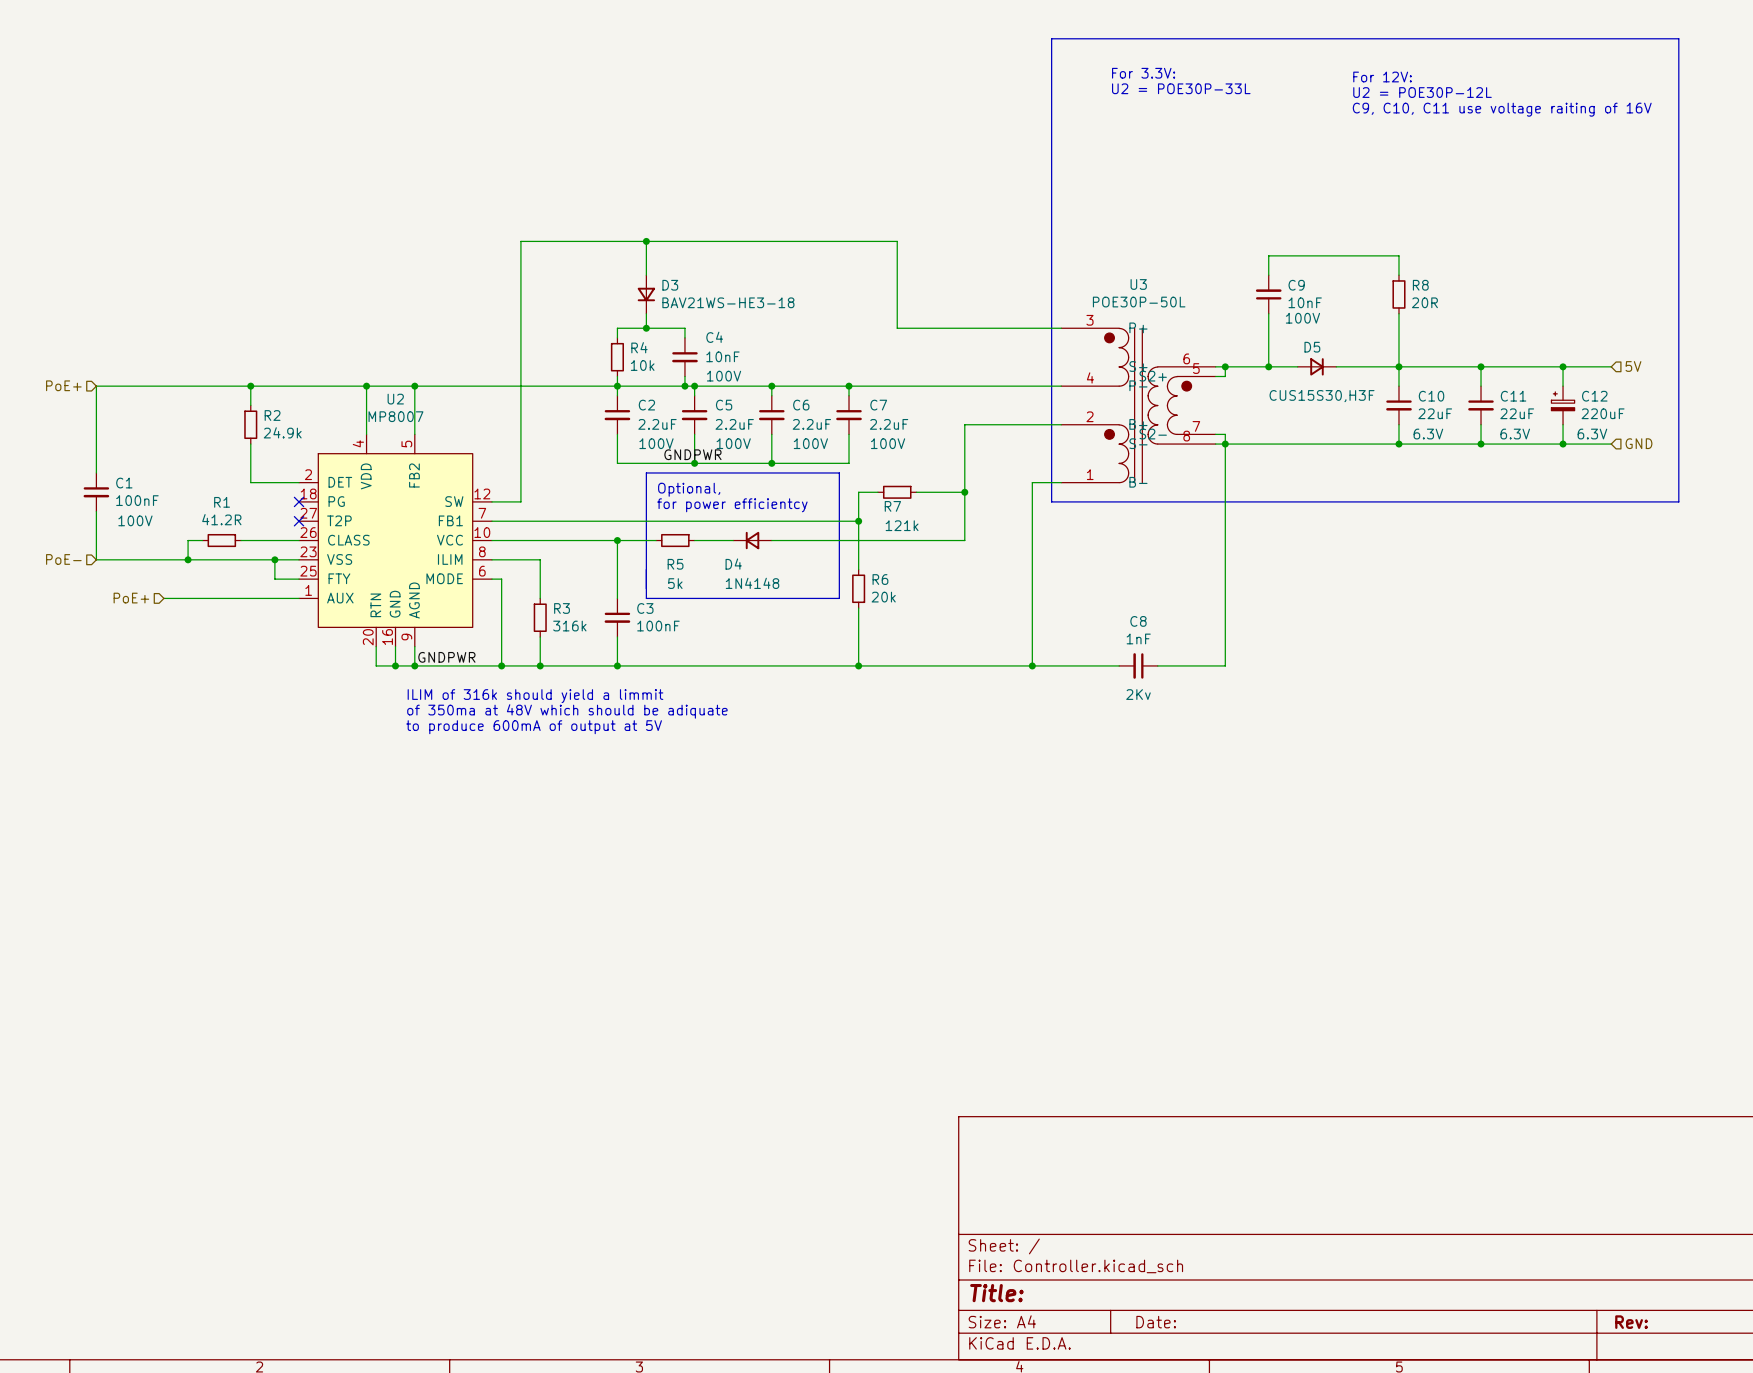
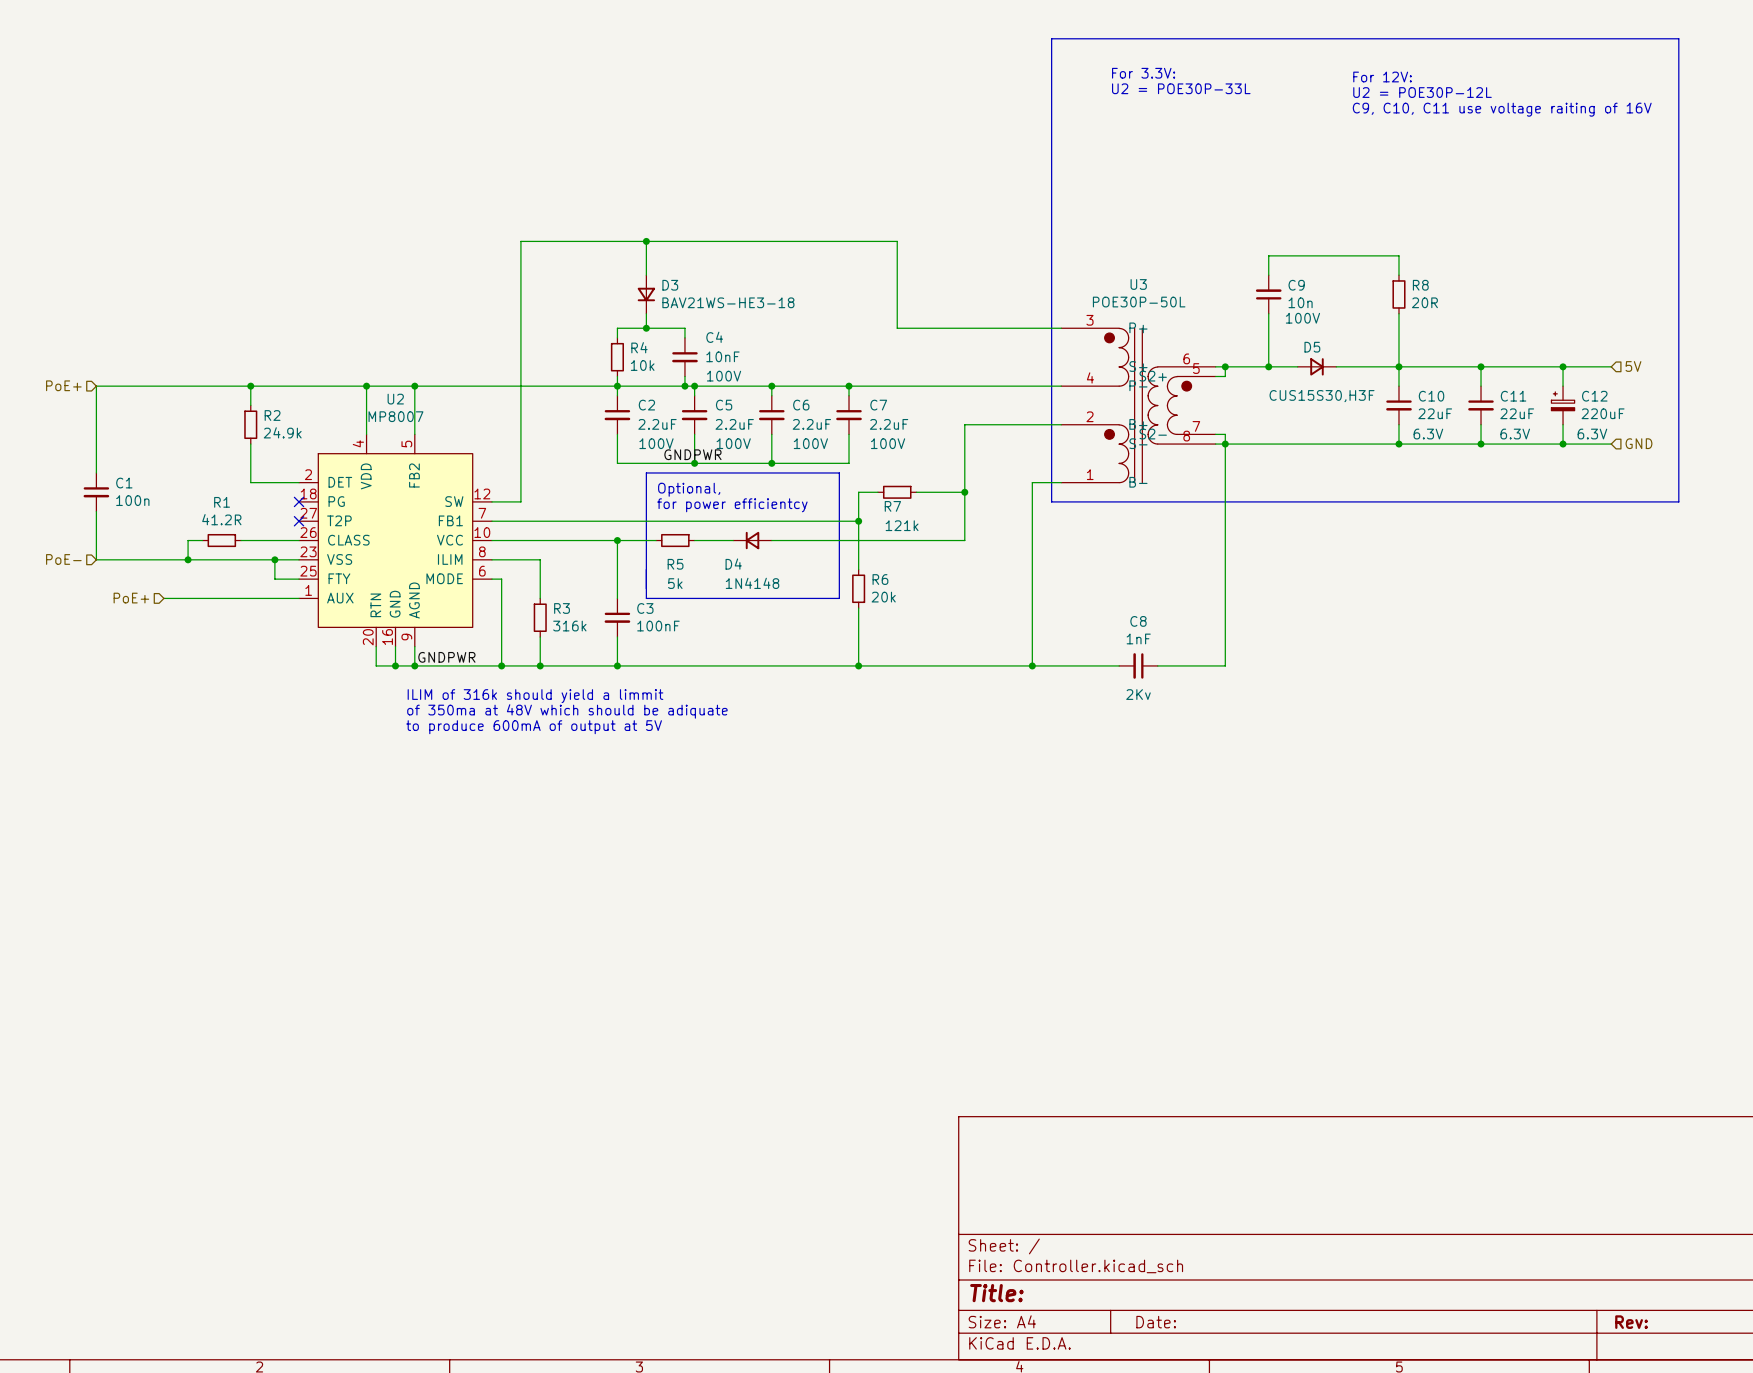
C9 value: 10nF (1305, 302) -> 10n (1300, 302)
C1 value: 100nF (137, 500) -> 100n (132, 500)
C1 text: 100V (135, 520) -> none

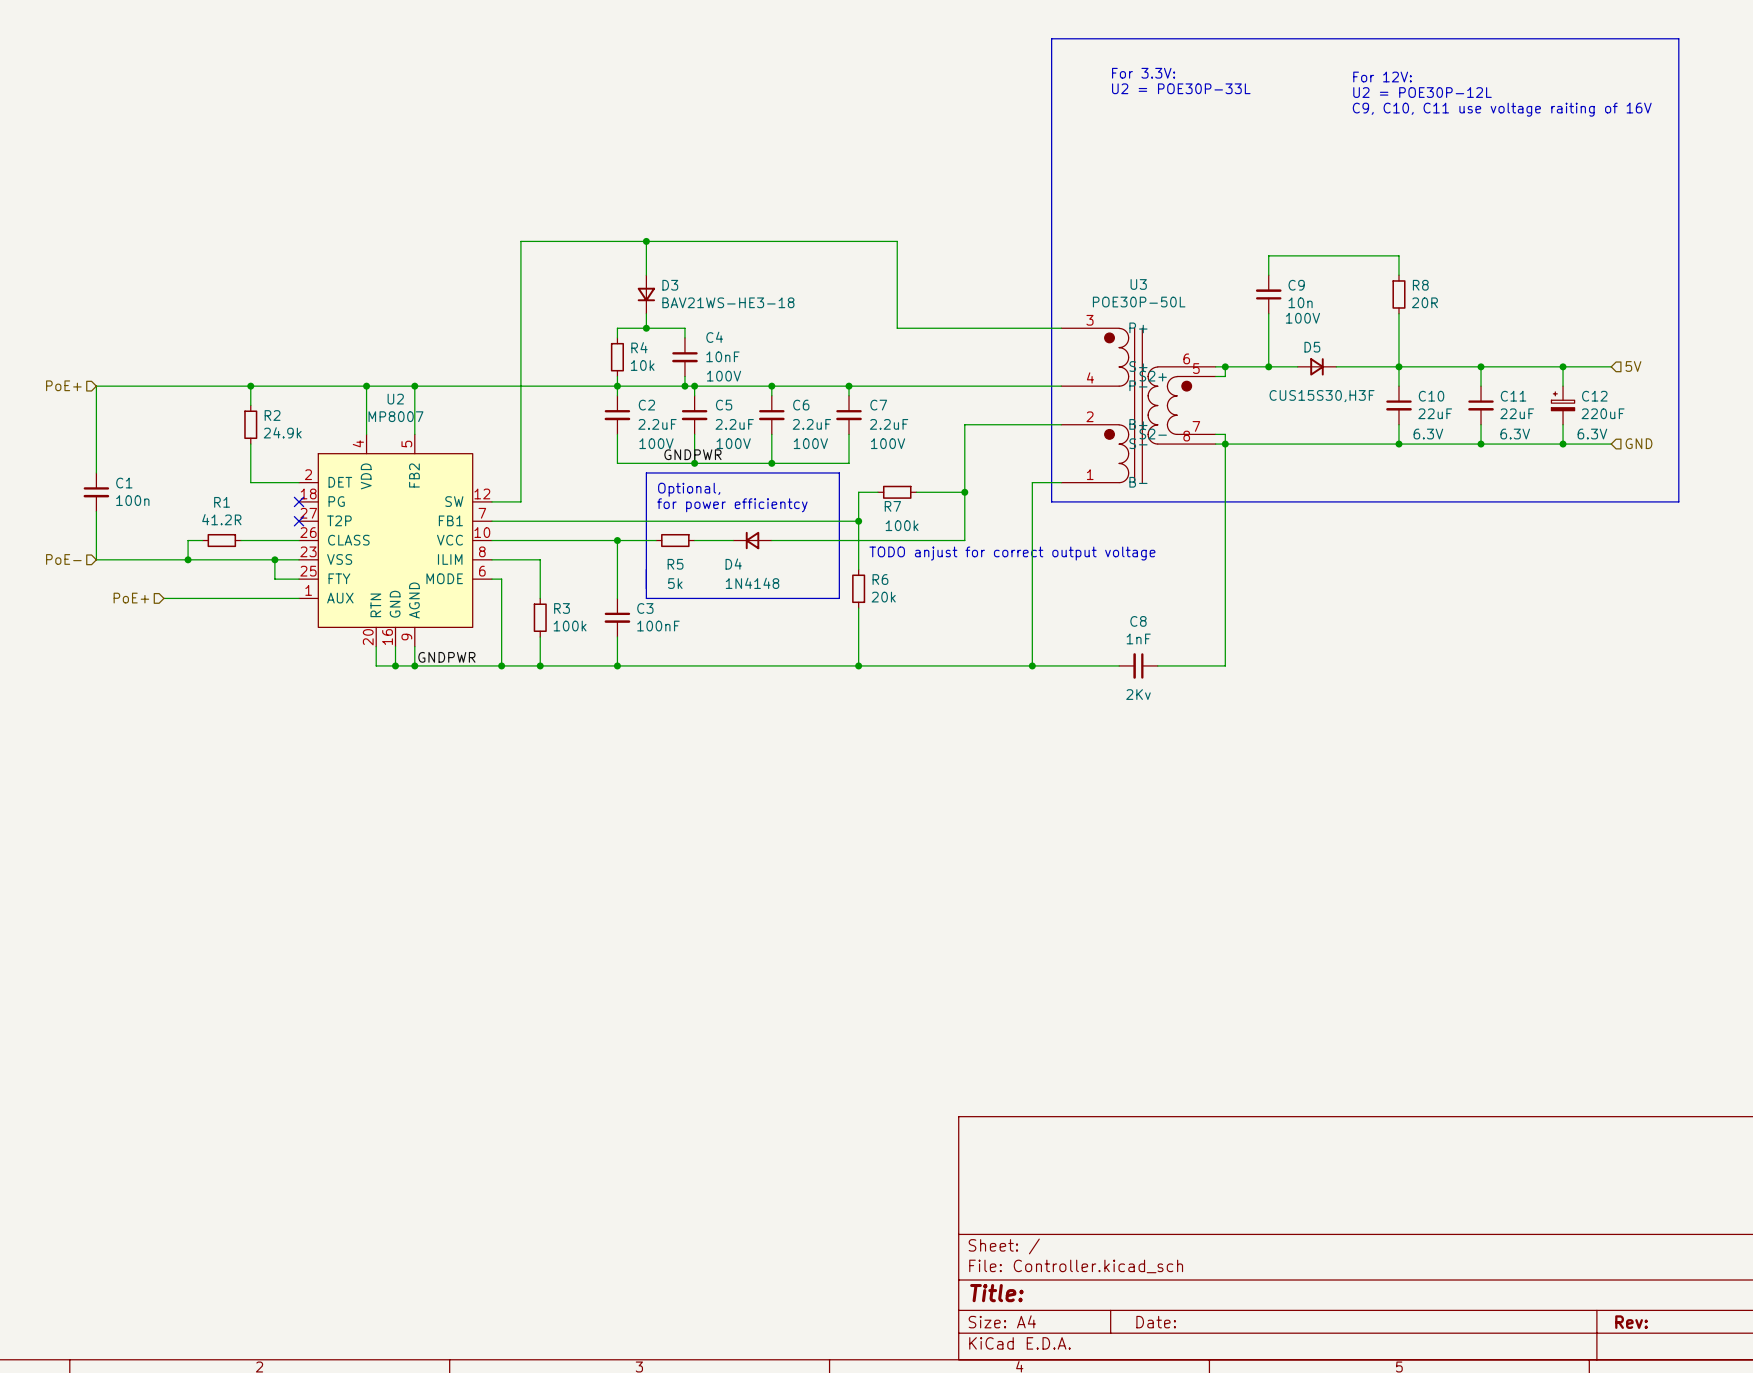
R7 value: 121k (902, 525) -> 100k (902, 525)
text: none -> TODO anjust for correct output voltage (1012, 553)
R3 value: 316k (569, 626) -> 100k (570, 626)
text: ILIM of 316k should yield a limmit (535, 696) -> none
text: of 350ma at 48V which should be adiquate (567, 711) -> none
text: to produce 600mA of output at 5V (534, 727) -> none

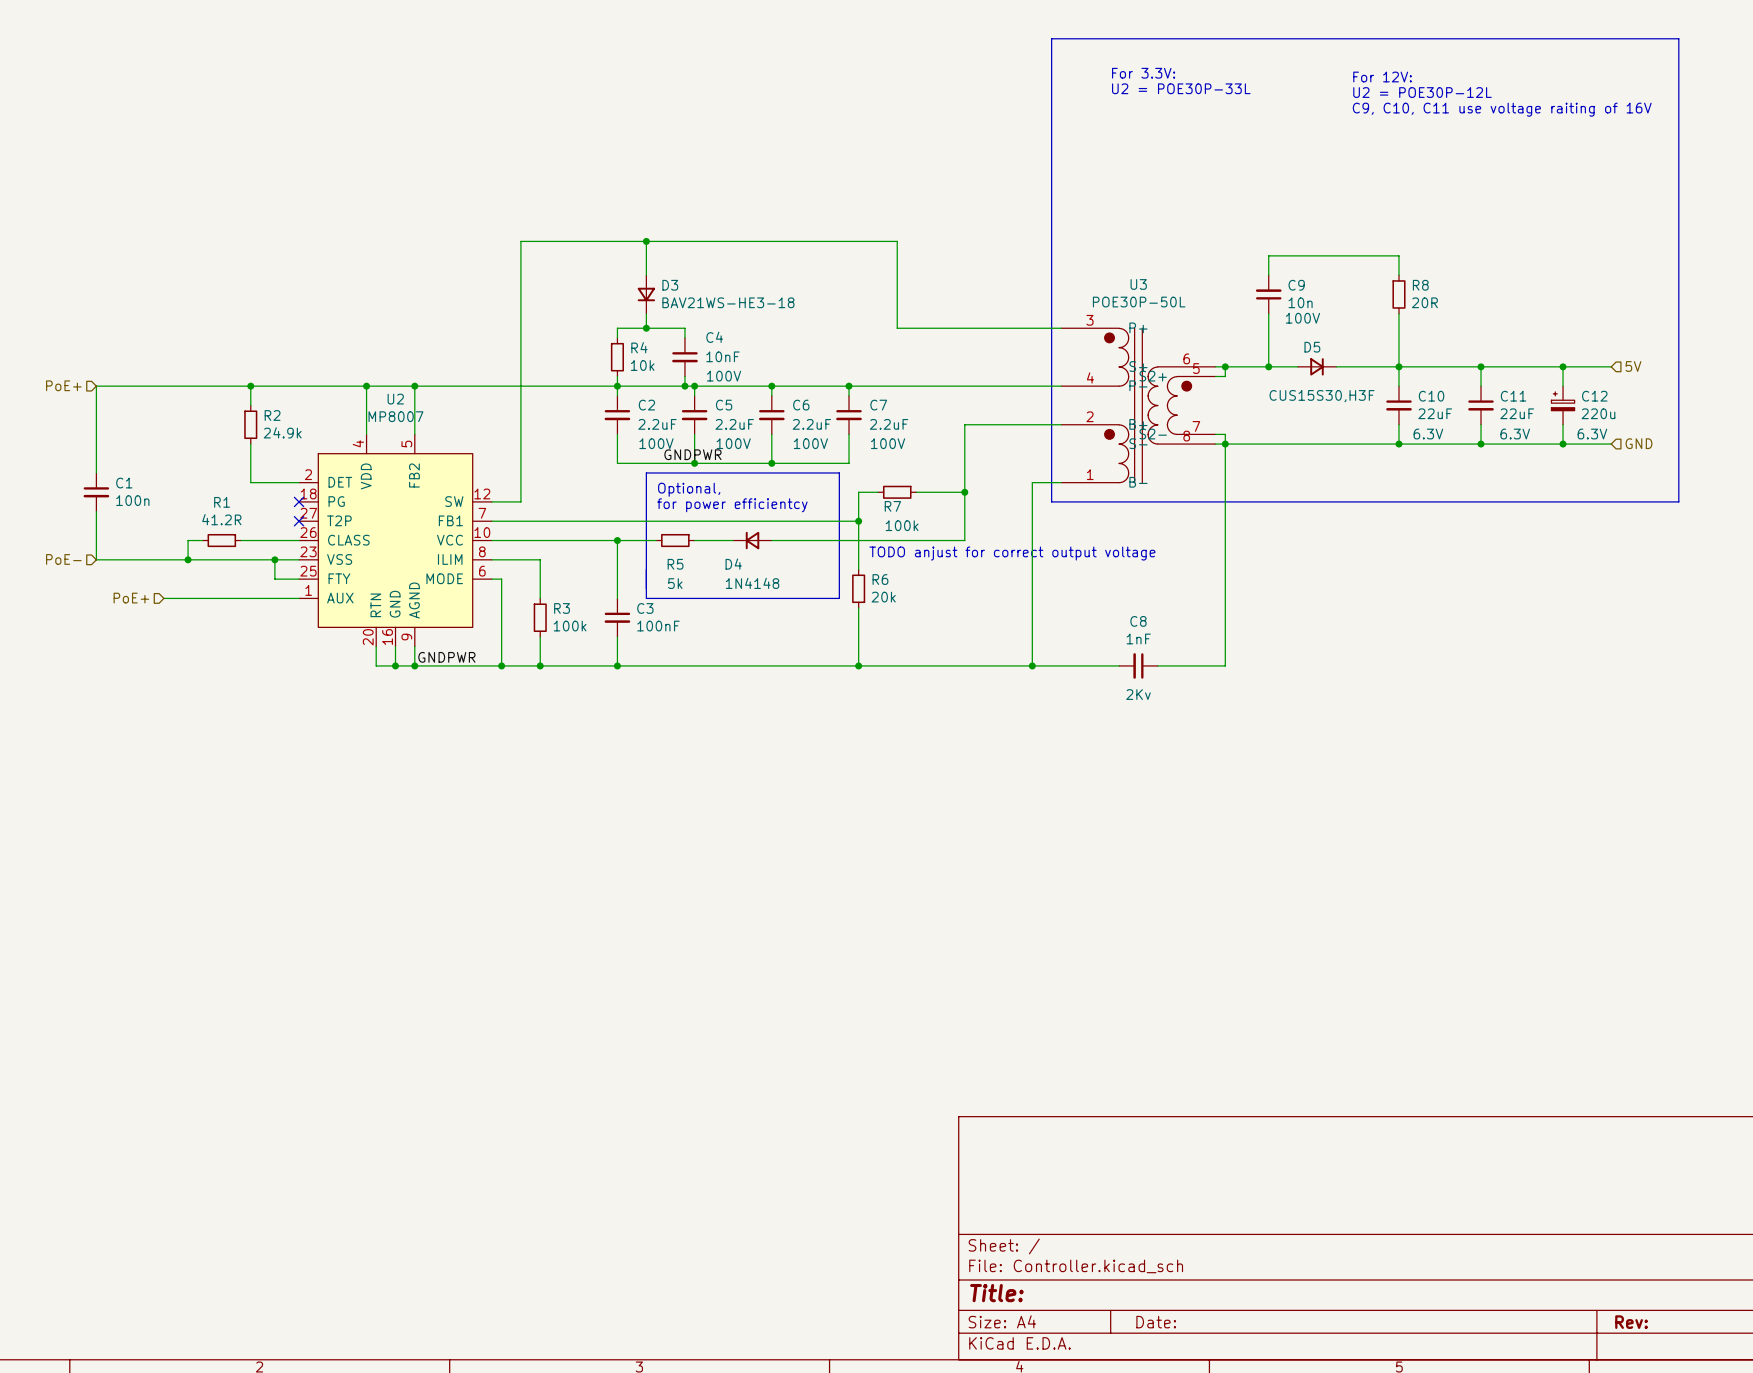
C12 value: 220uF (1603, 413) -> 220u (1598, 413)

